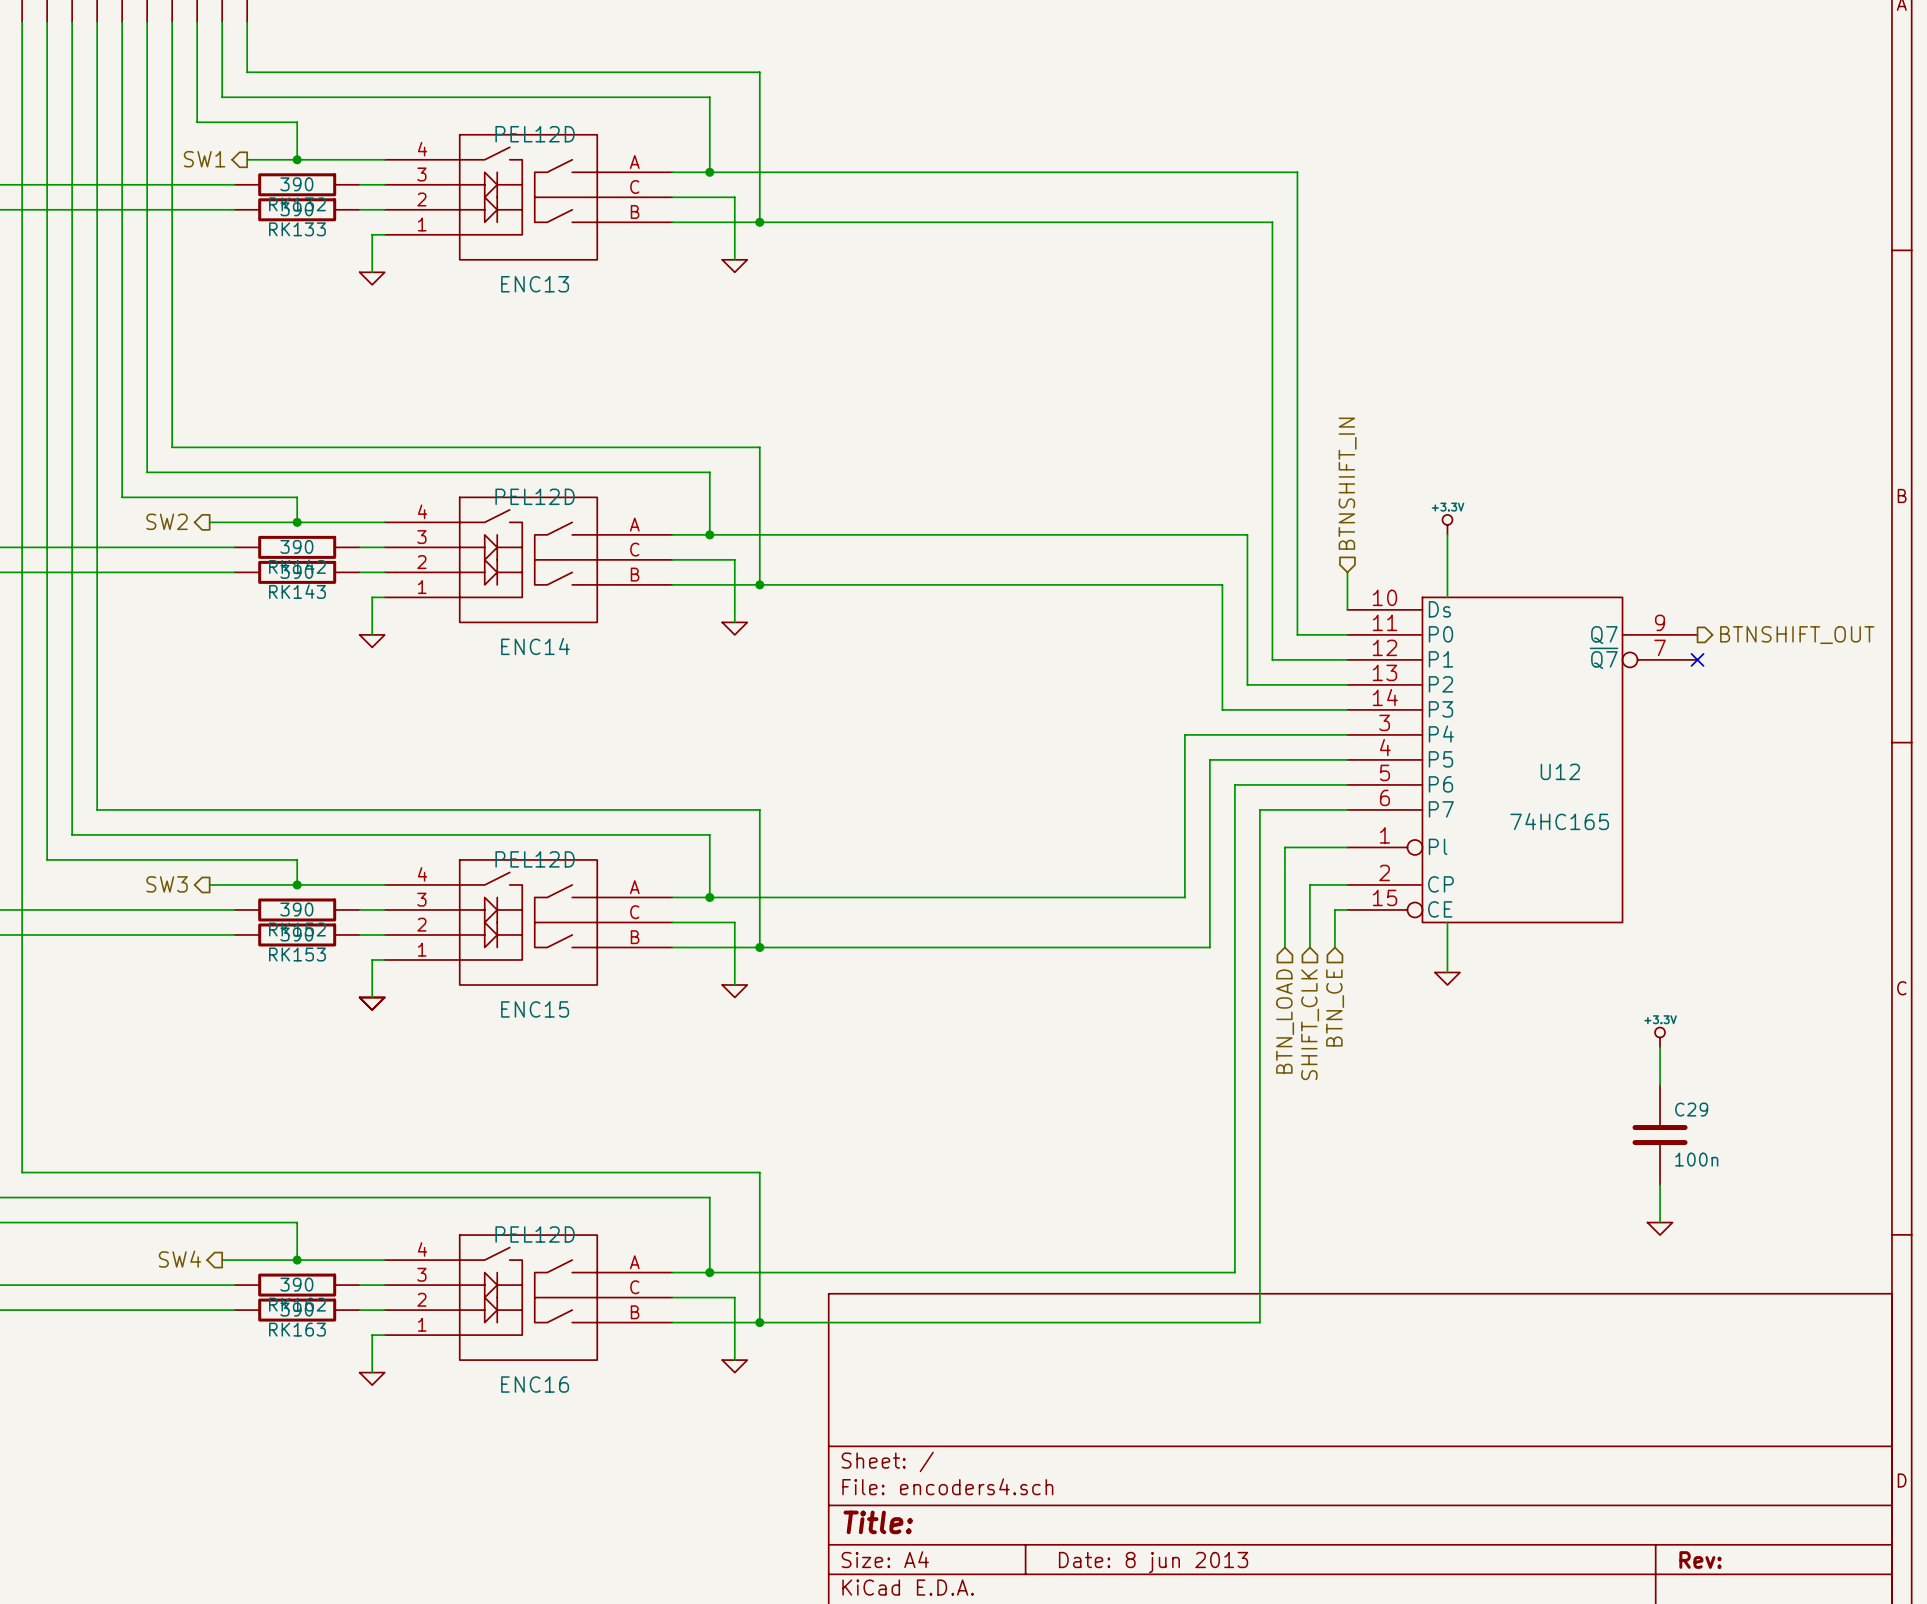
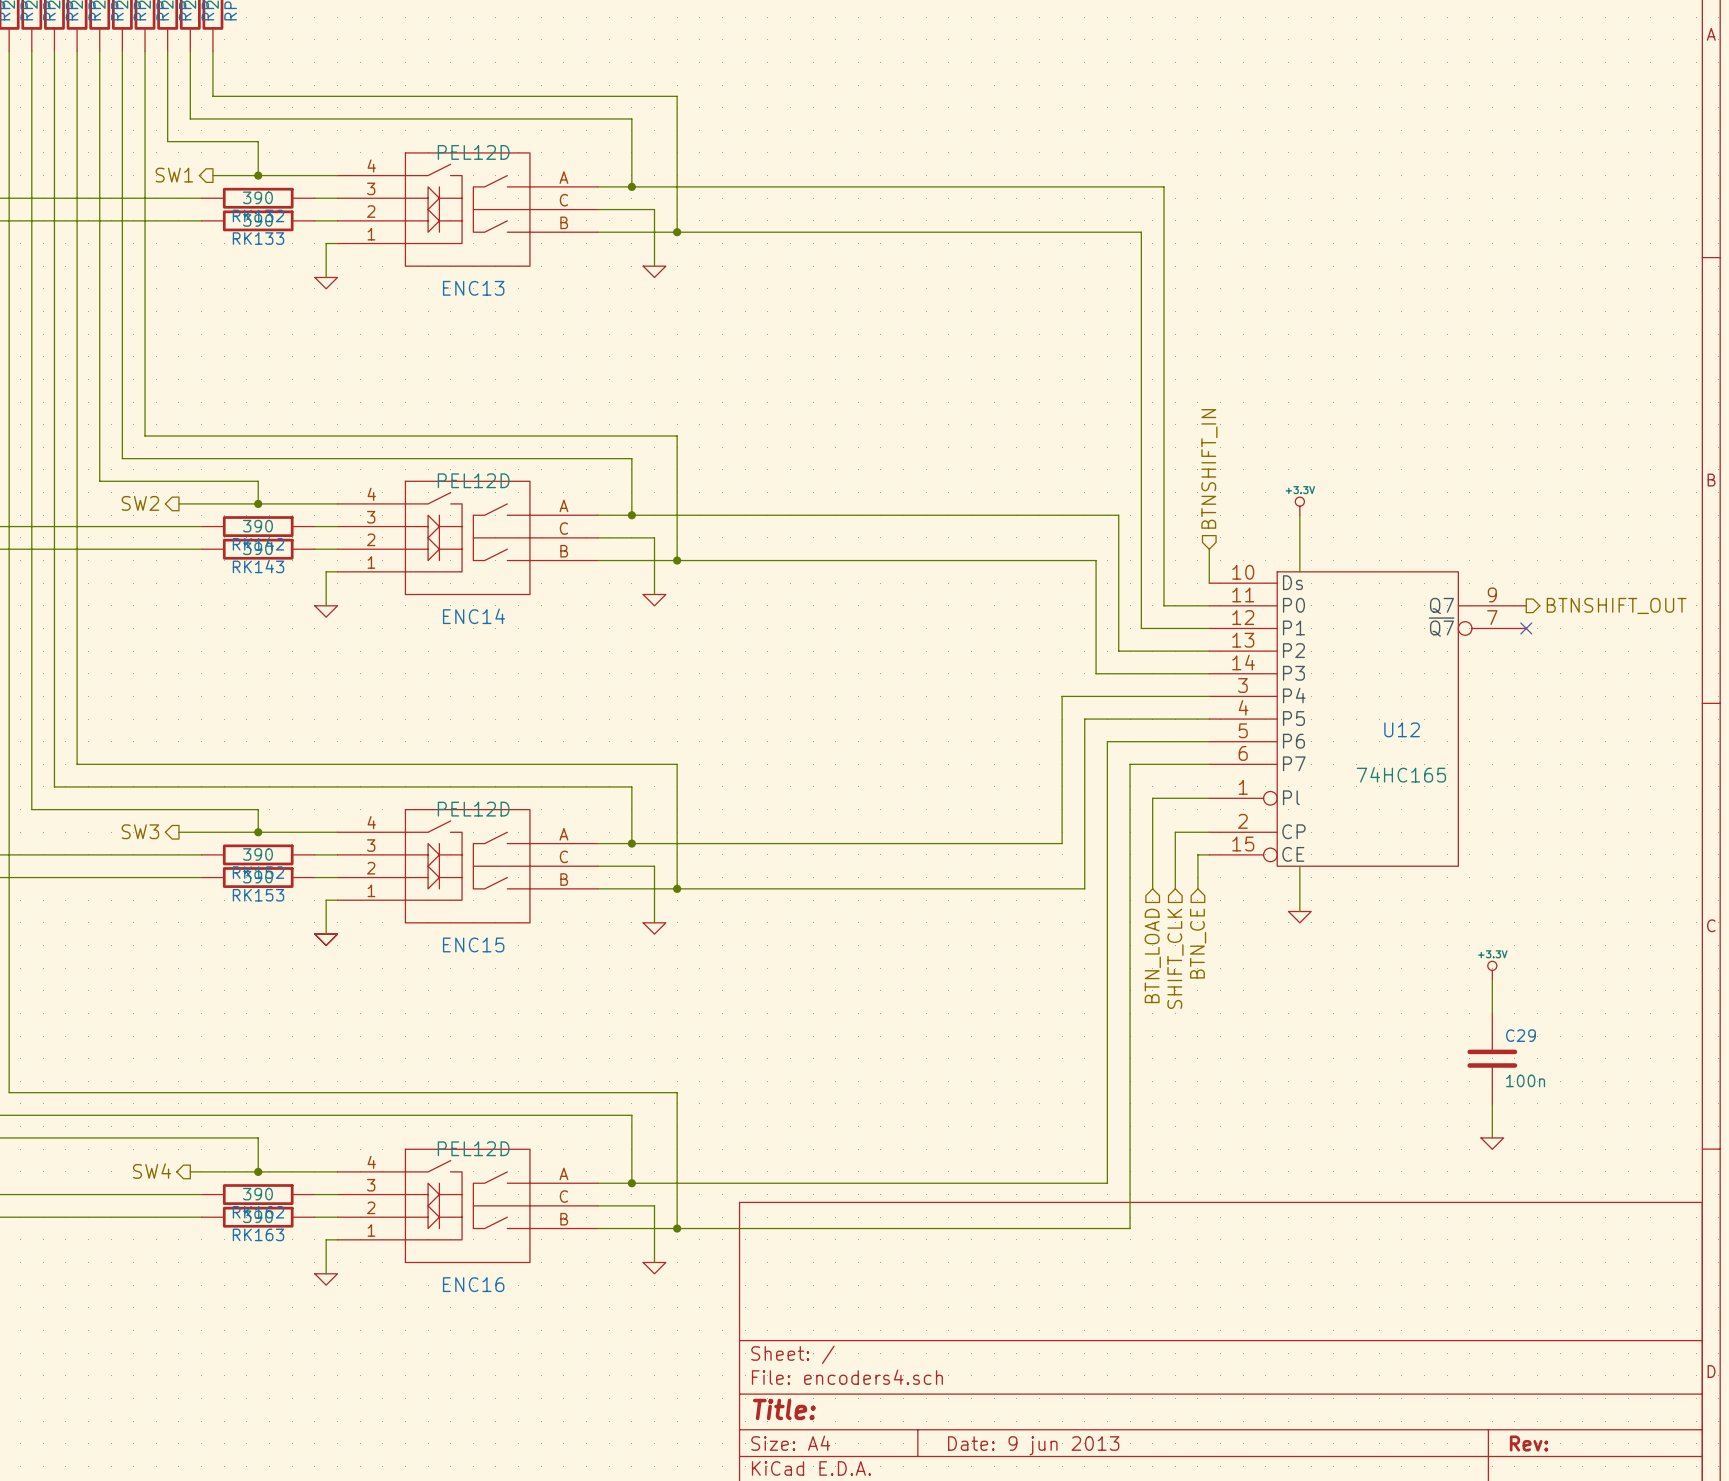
title block: Date: 8 jun 2013 (1153, 1562) -> Date: 9 jun 2013 (1033, 1445)

